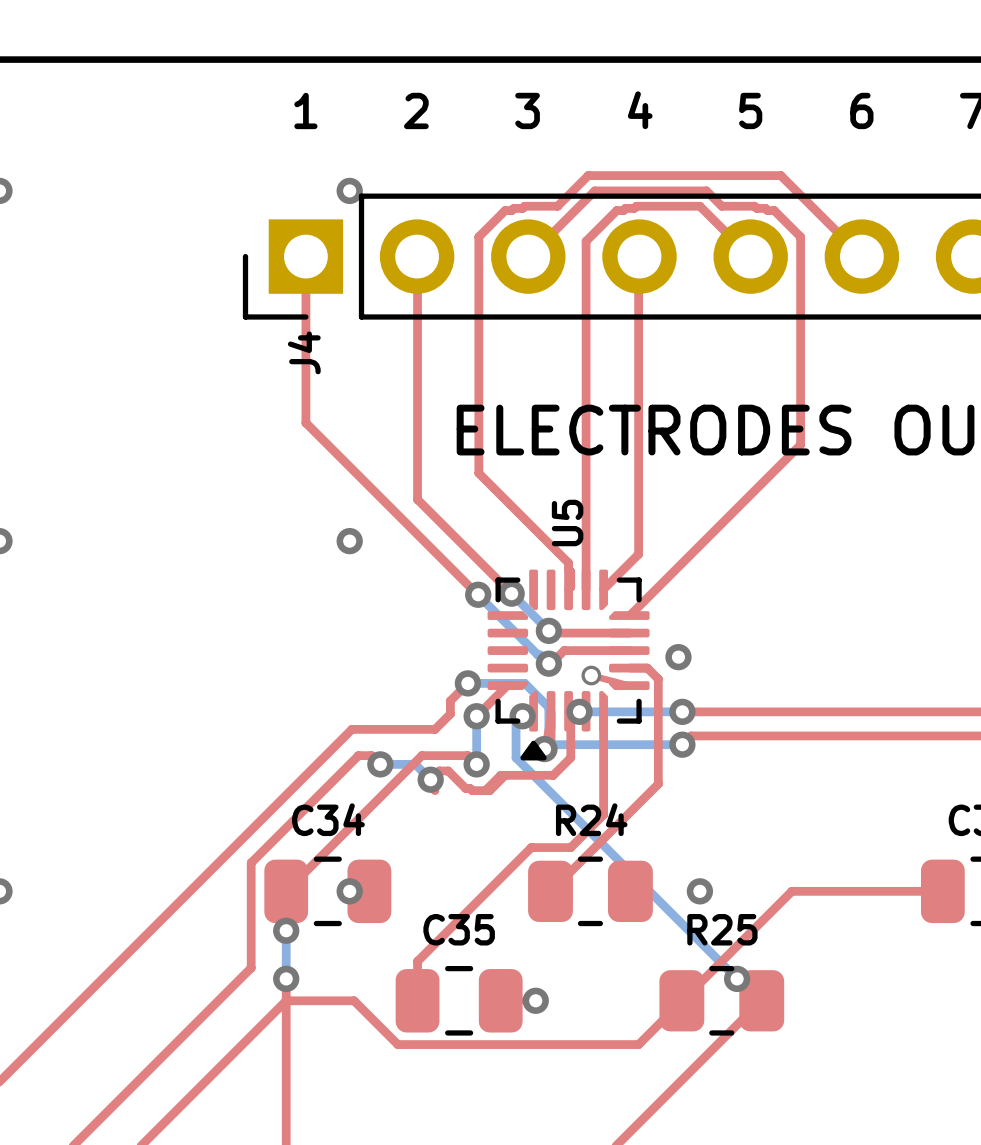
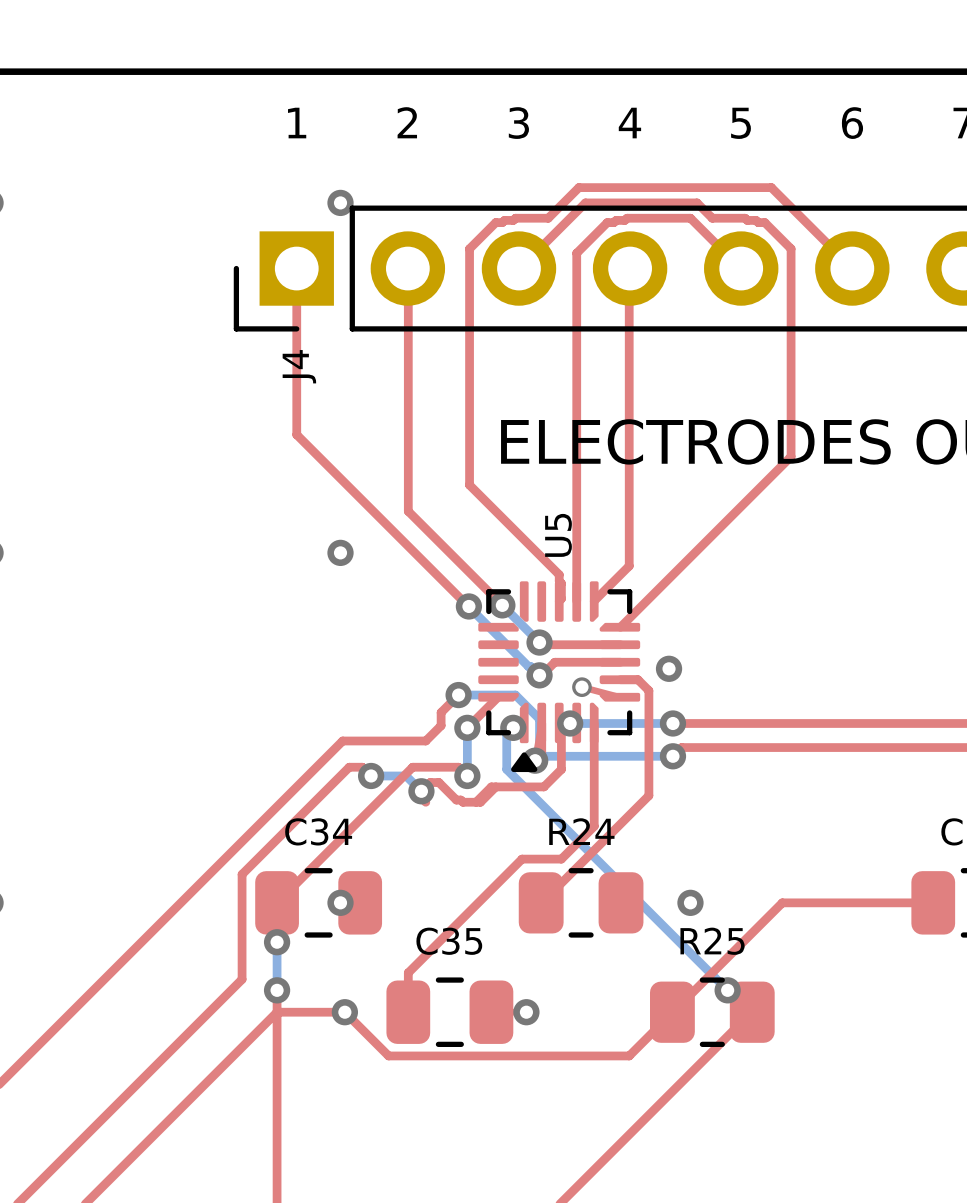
via: none -> (344, 1012)

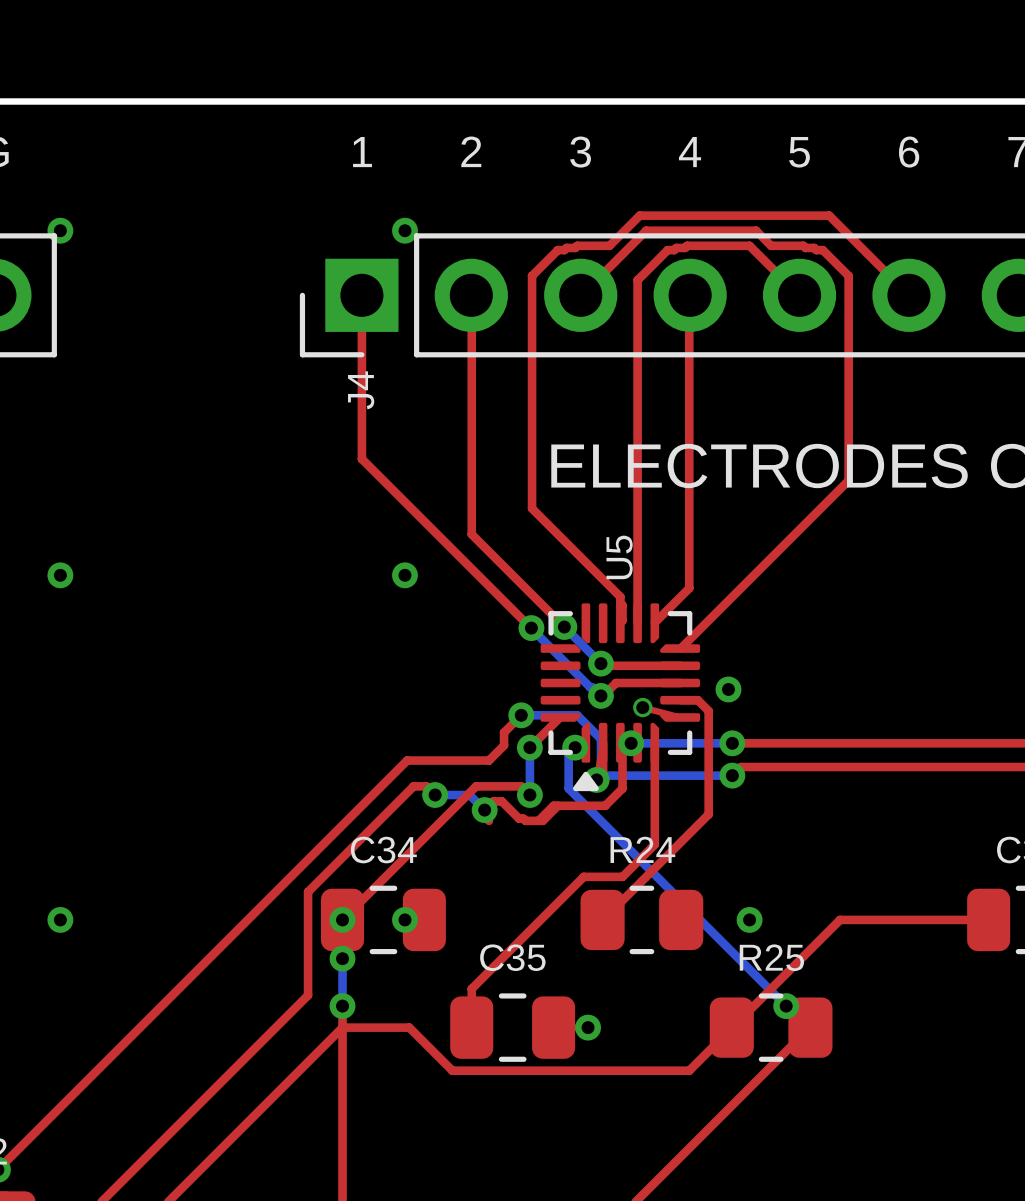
via position: (344, 1012) -> (342, 919)

